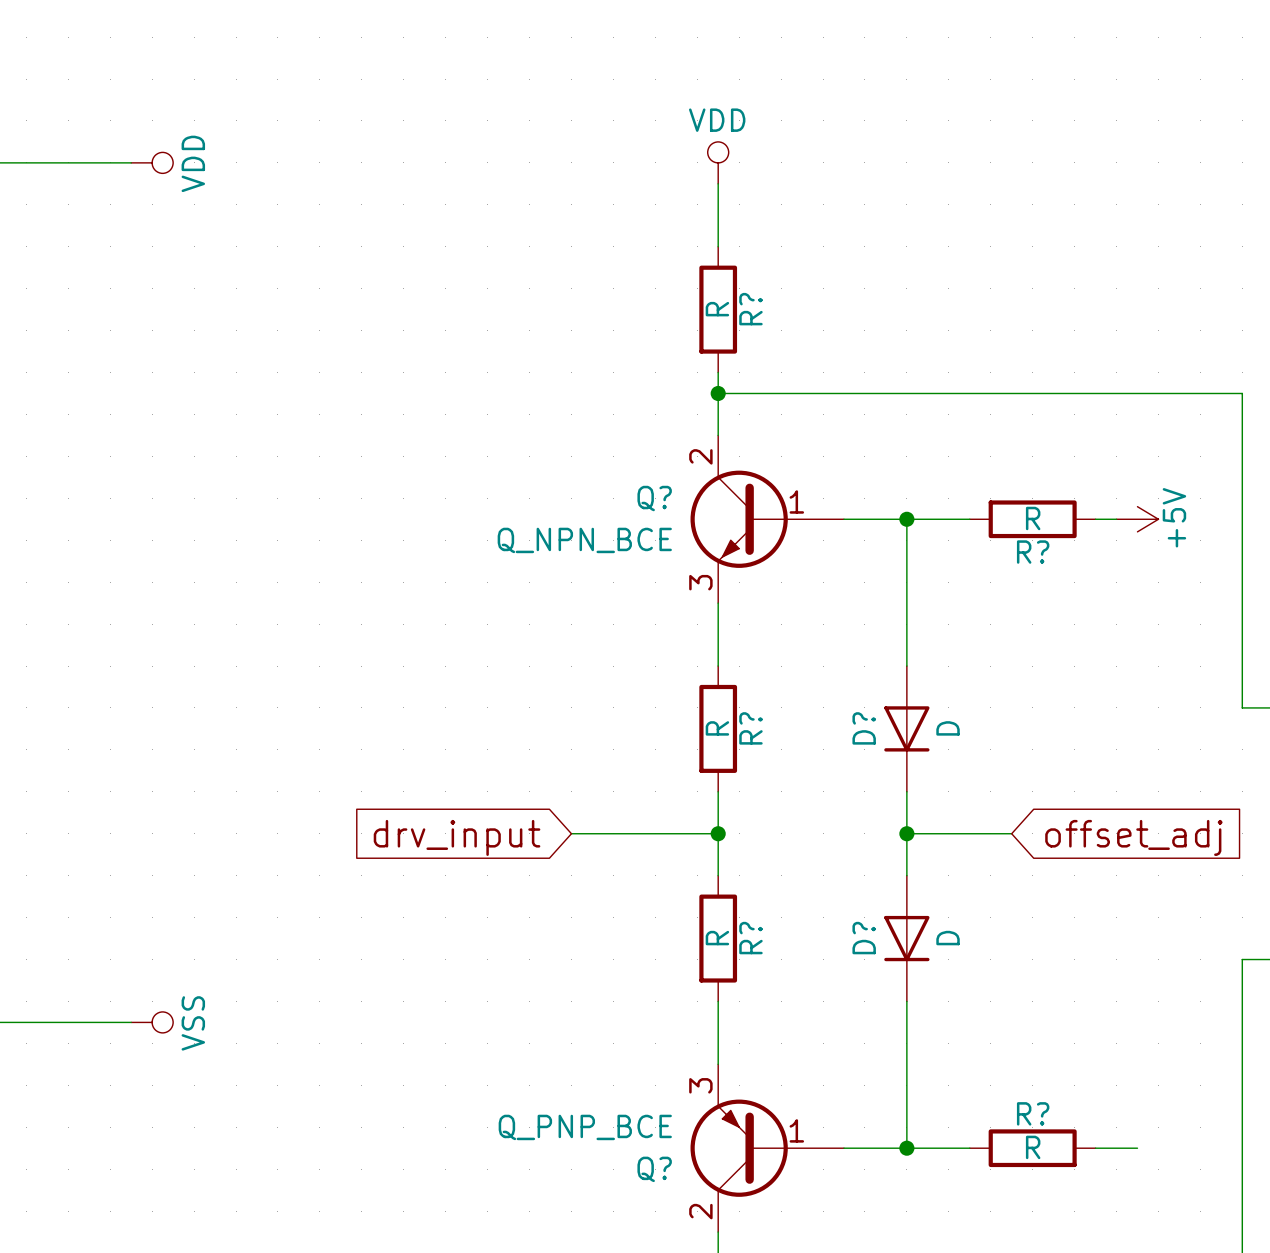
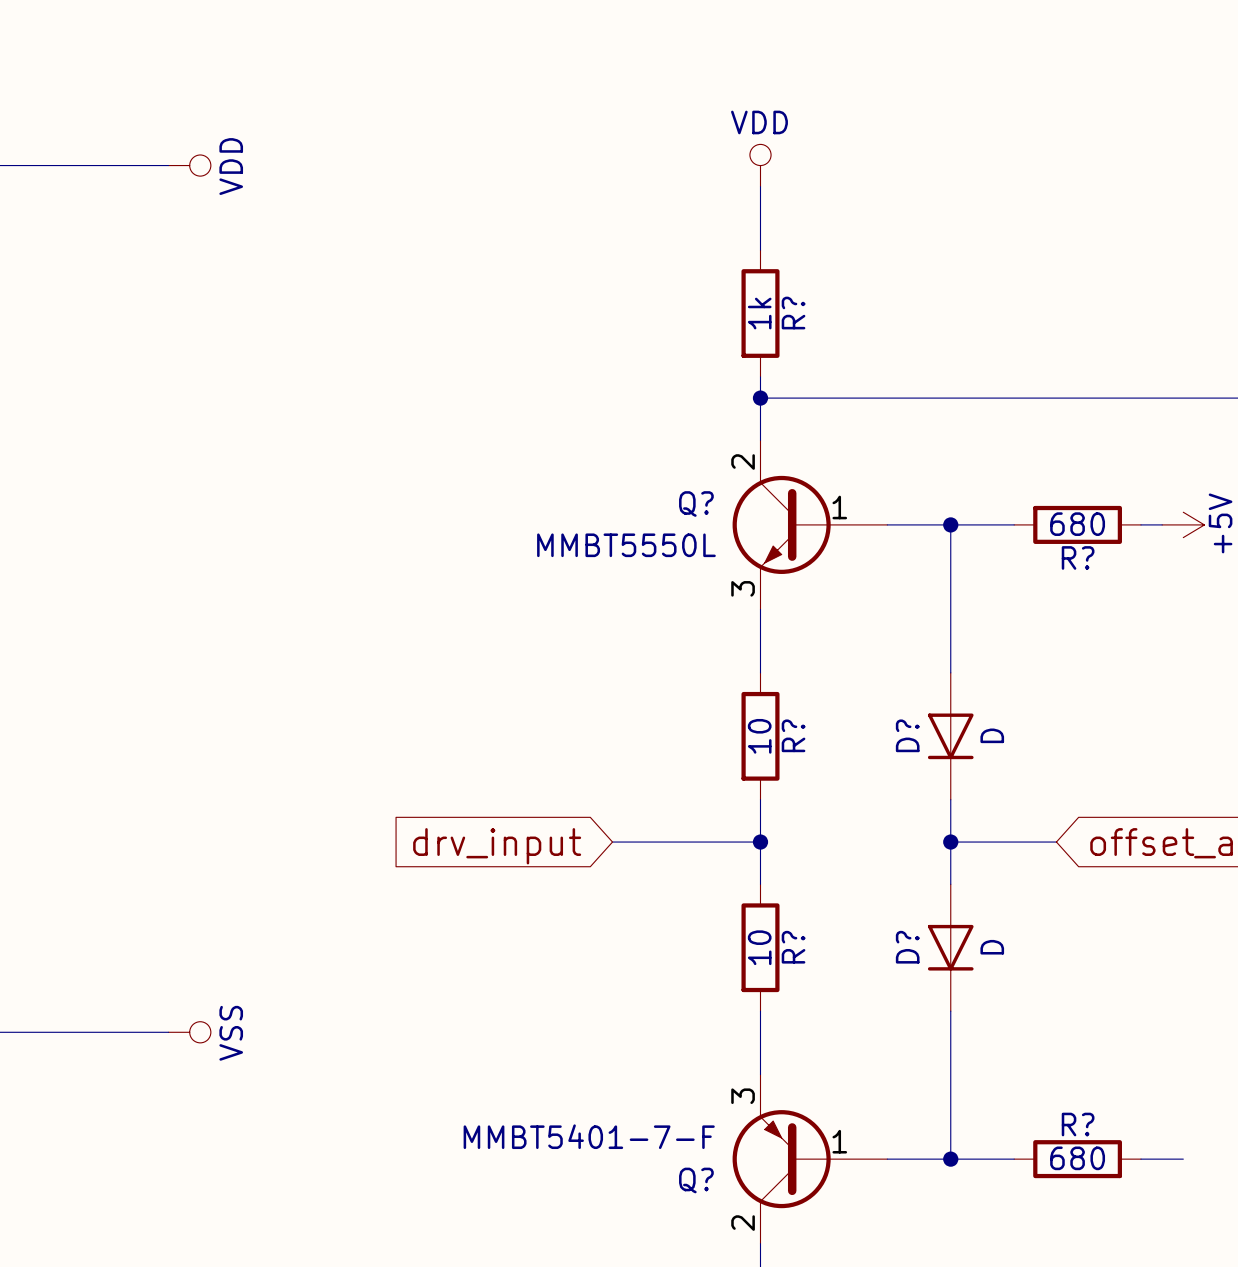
R? value: R (717, 309) -> 1k (759, 313)
R? value: R (1033, 518) -> 680 (1077, 524)
Q? value: Q_NPN_BCE (584, 540) -> MMBT5550L (626, 545)
R? value: R (717, 728) -> 10 (759, 736)
R? value: R (717, 938) -> 10 (759, 947)
Q? value: Q_PNP_BCE (585, 1127) -> MMBT5401-7-F (589, 1136)
R? value: R (1033, 1147) -> 680 (1077, 1158)

